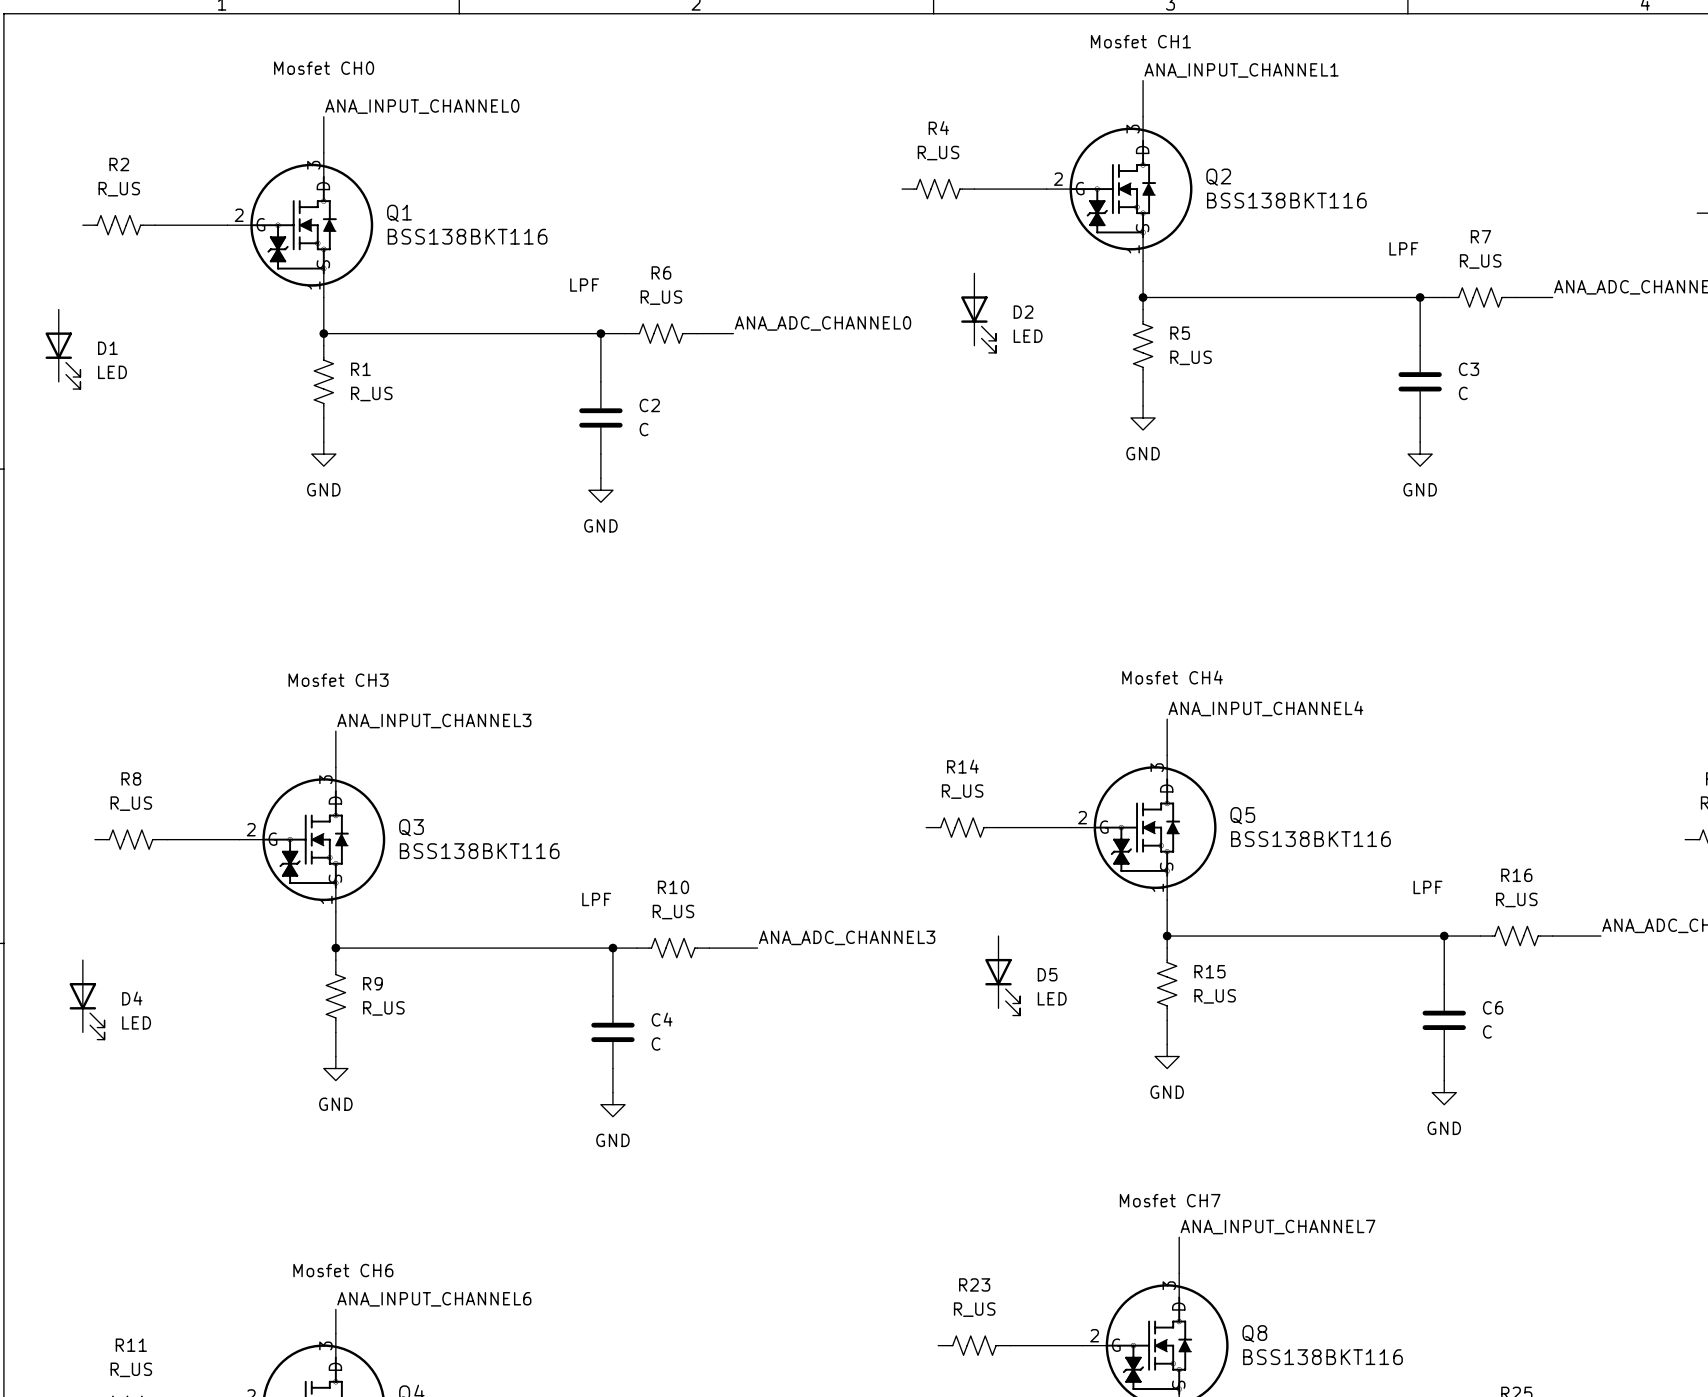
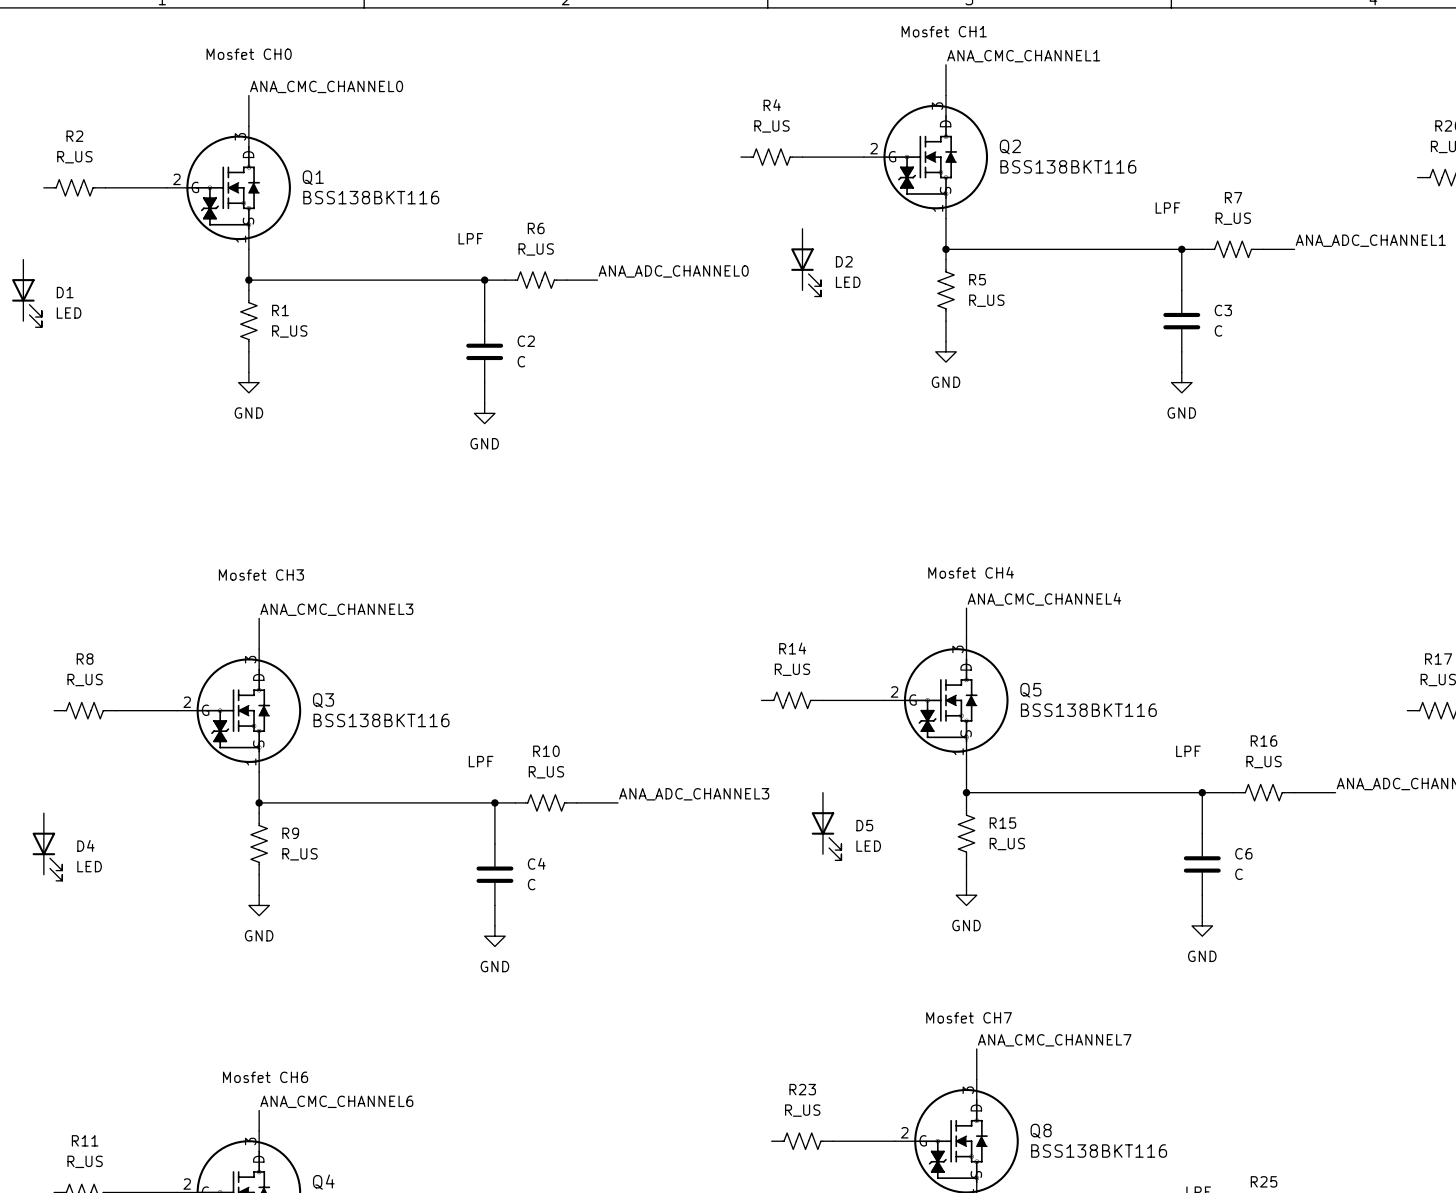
label: ANA_INPUT_CHANNEL1 (1241, 70) -> ANA_CMC_CHANNEL1 (1023, 56)
label: ANA_INPUT_CHANNEL0 (422, 106) -> ANA_CMC_CHANNEL0 (326, 86)
label: ANA_INPUT_CHANNEL4 (1265, 708) -> ANA_CMC_CHANNEL4 (1044, 599)
label: ANA_INPUT_CHANNEL3 (434, 721) -> ANA_CMC_CHANNEL3 (336, 609)
label: ANA_INPUT_CHANNEL7 (1277, 1227) -> ANA_CMC_CHANNEL7 (1054, 1040)
label: ANA_INPUT_CHANNEL6 (434, 1299) -> ANA_CMC_CHANNEL6 (336, 1101)

